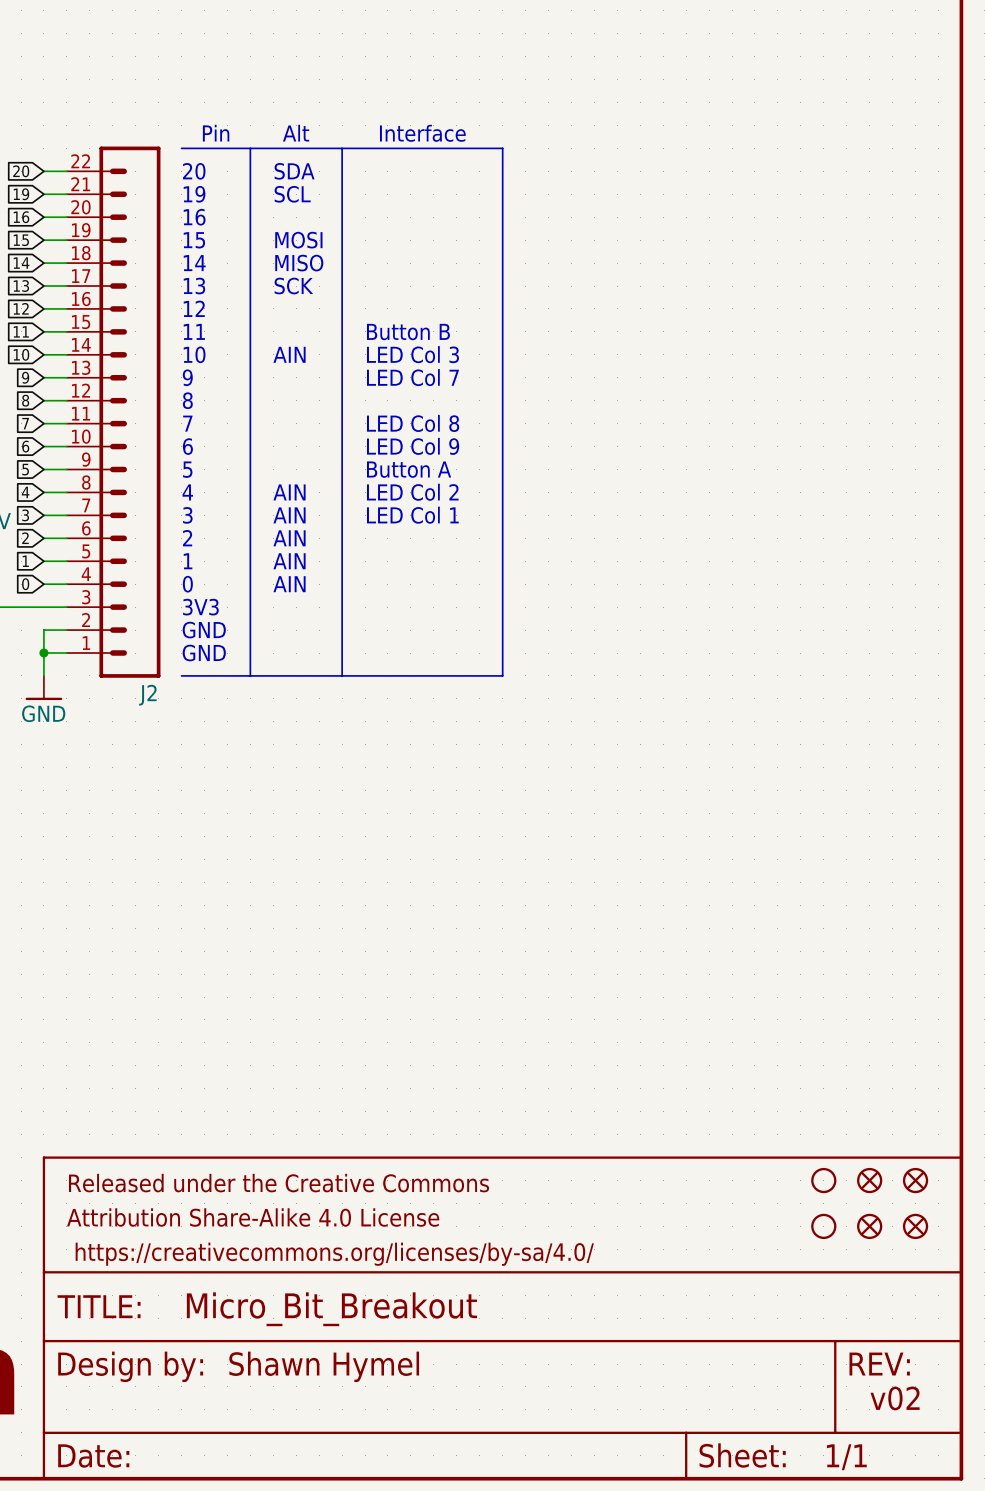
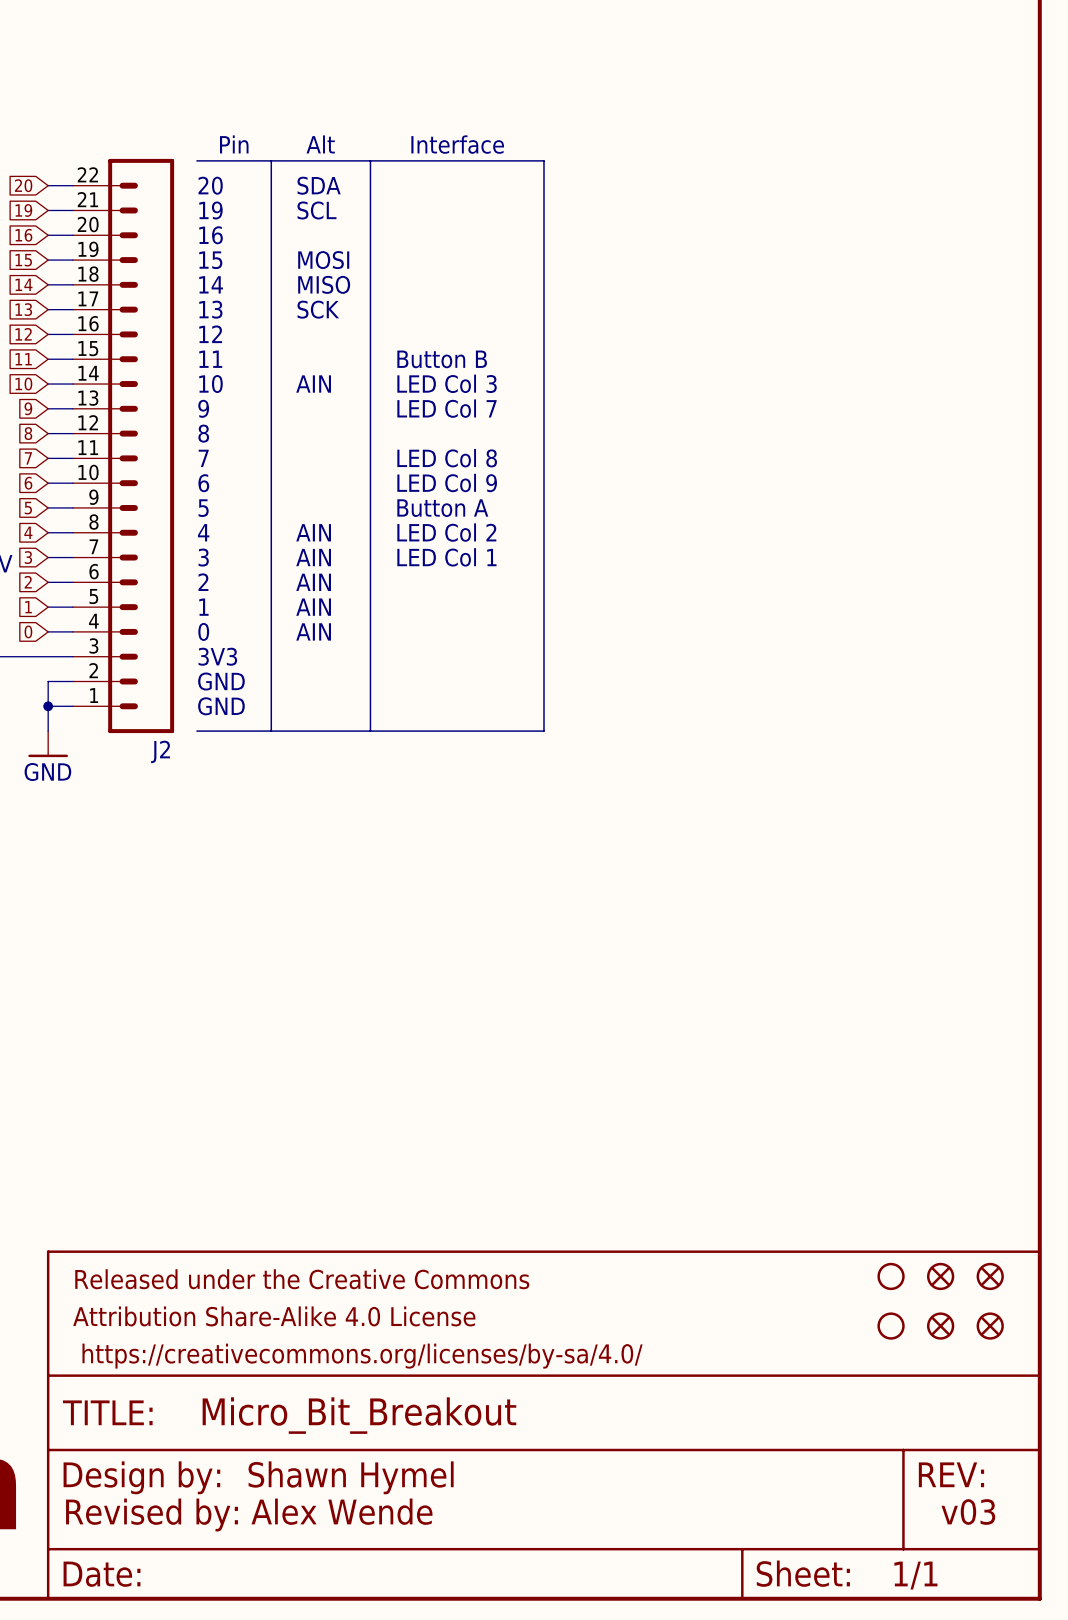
text: v02 (895, 1398) -> v03 (968, 1512)
text: none -> Revised by: Alex Wende (249, 1515)

